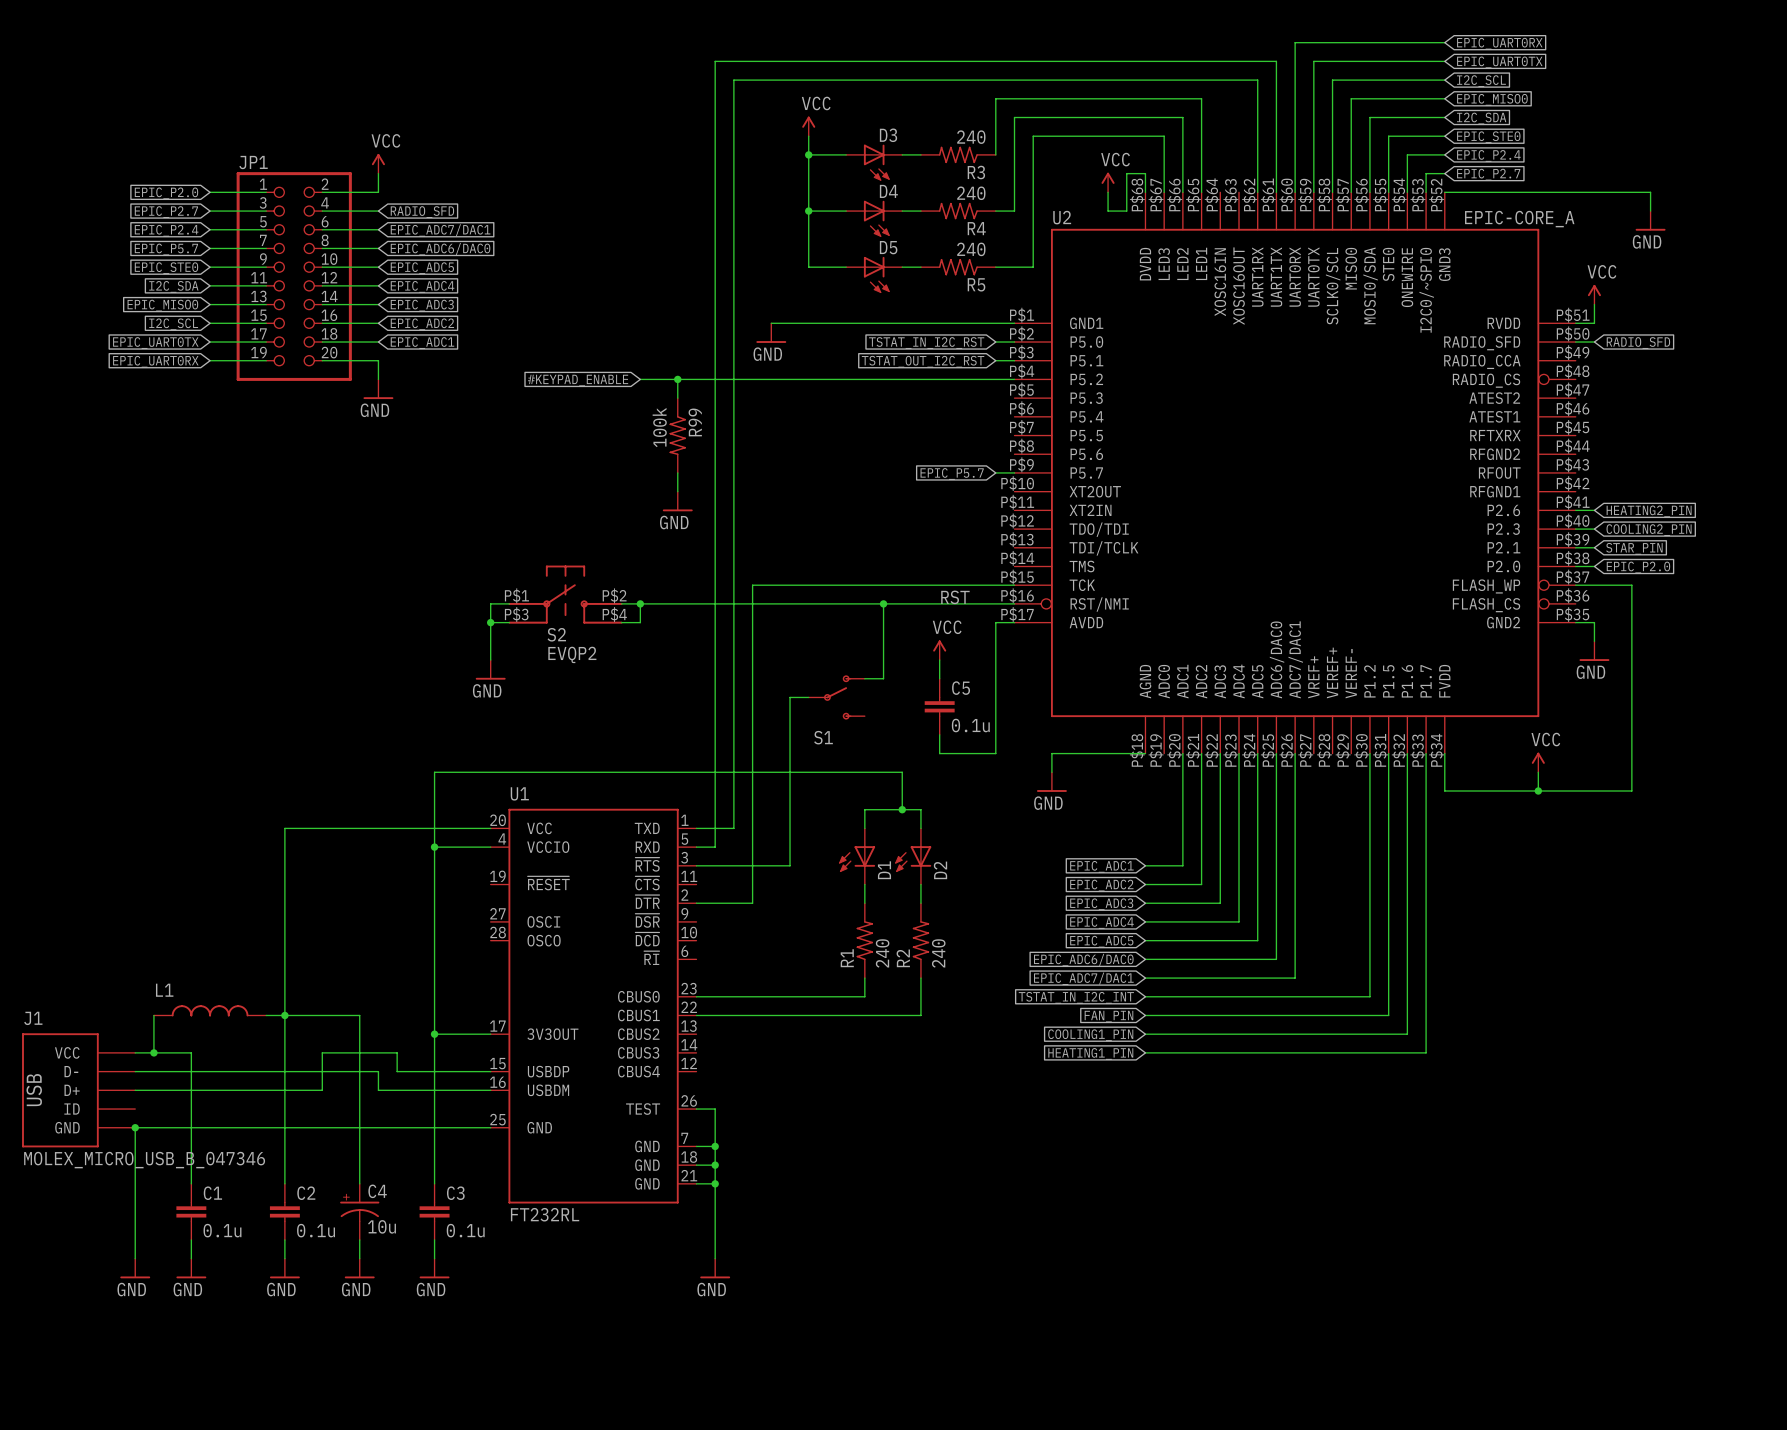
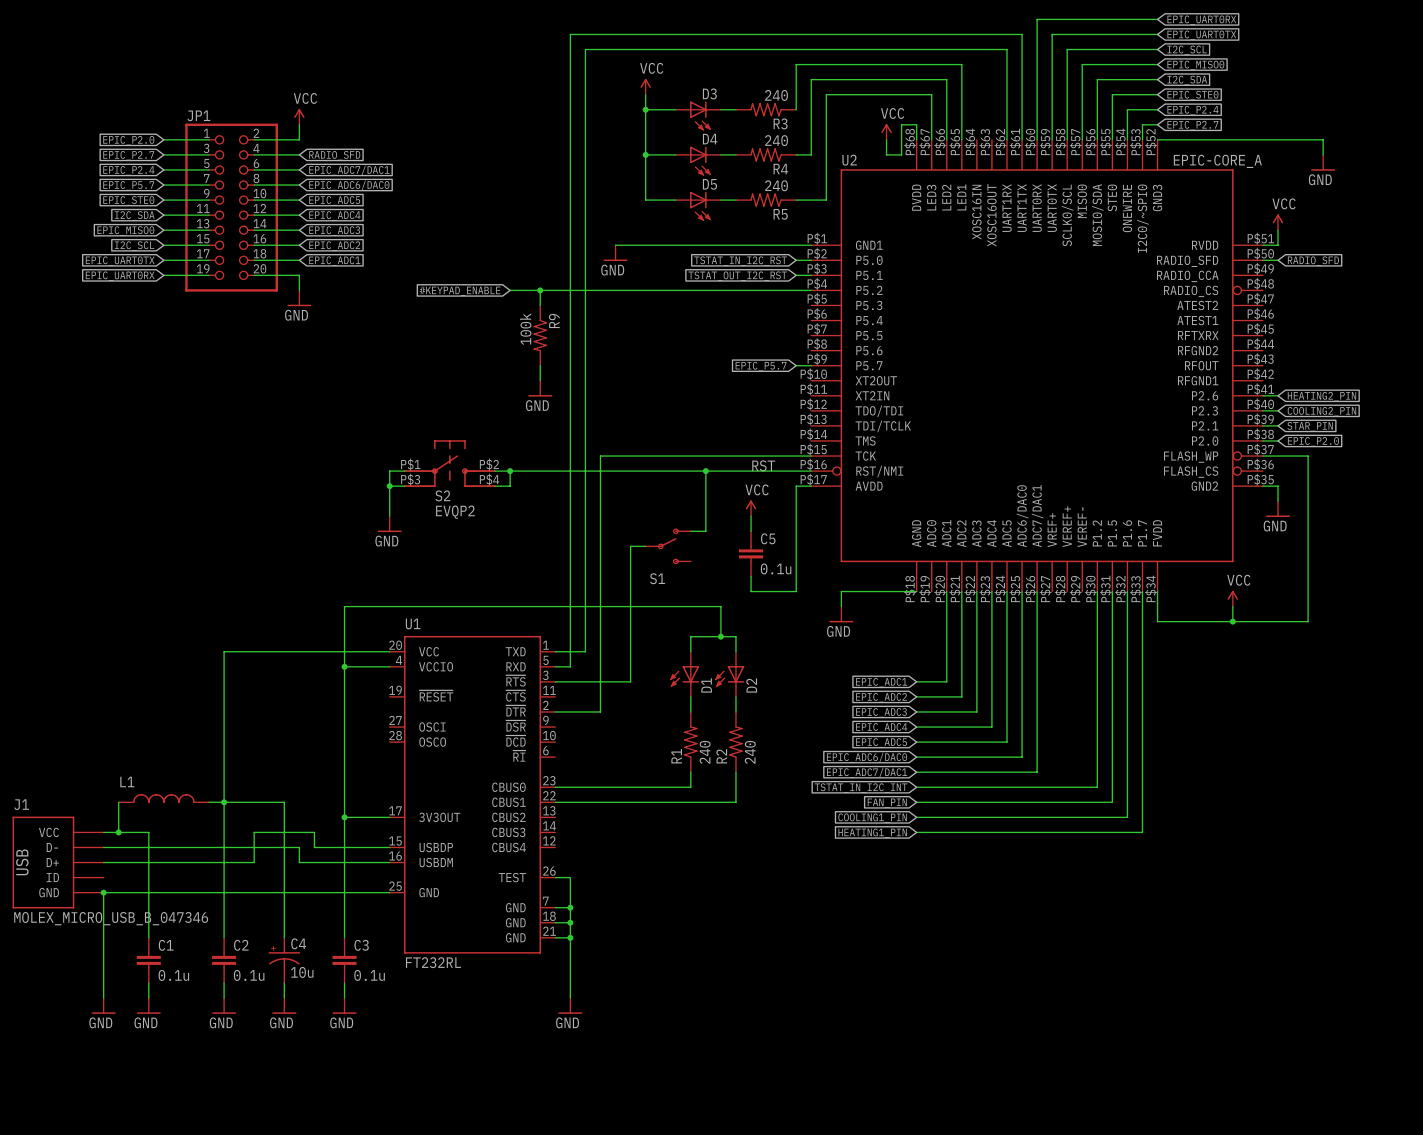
R99 name: R99 (695, 422) -> R9 (554, 320)

